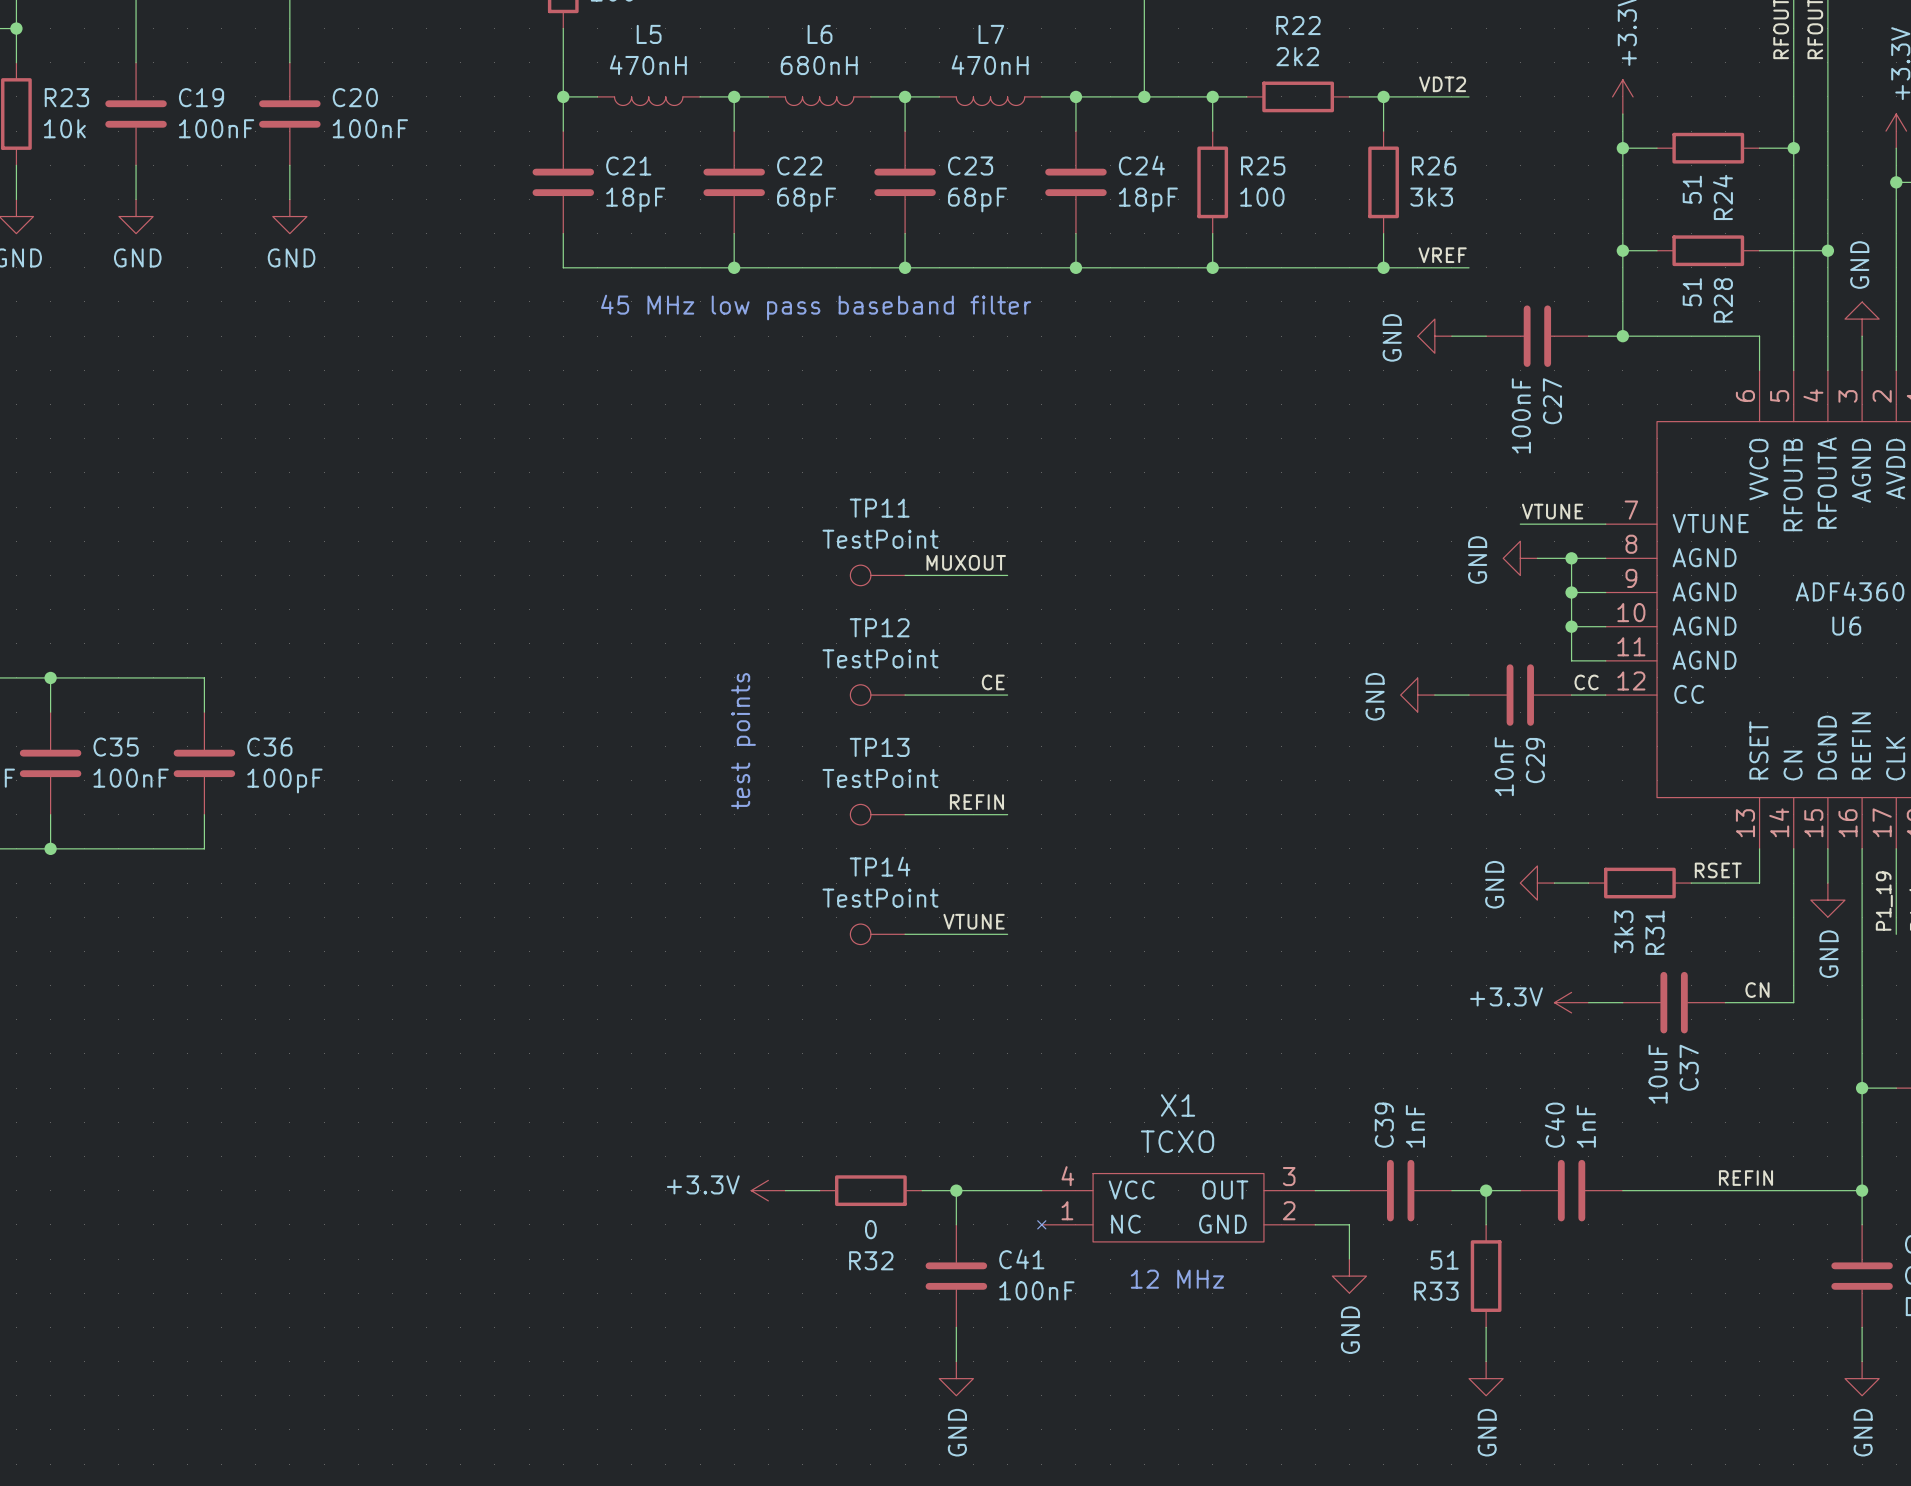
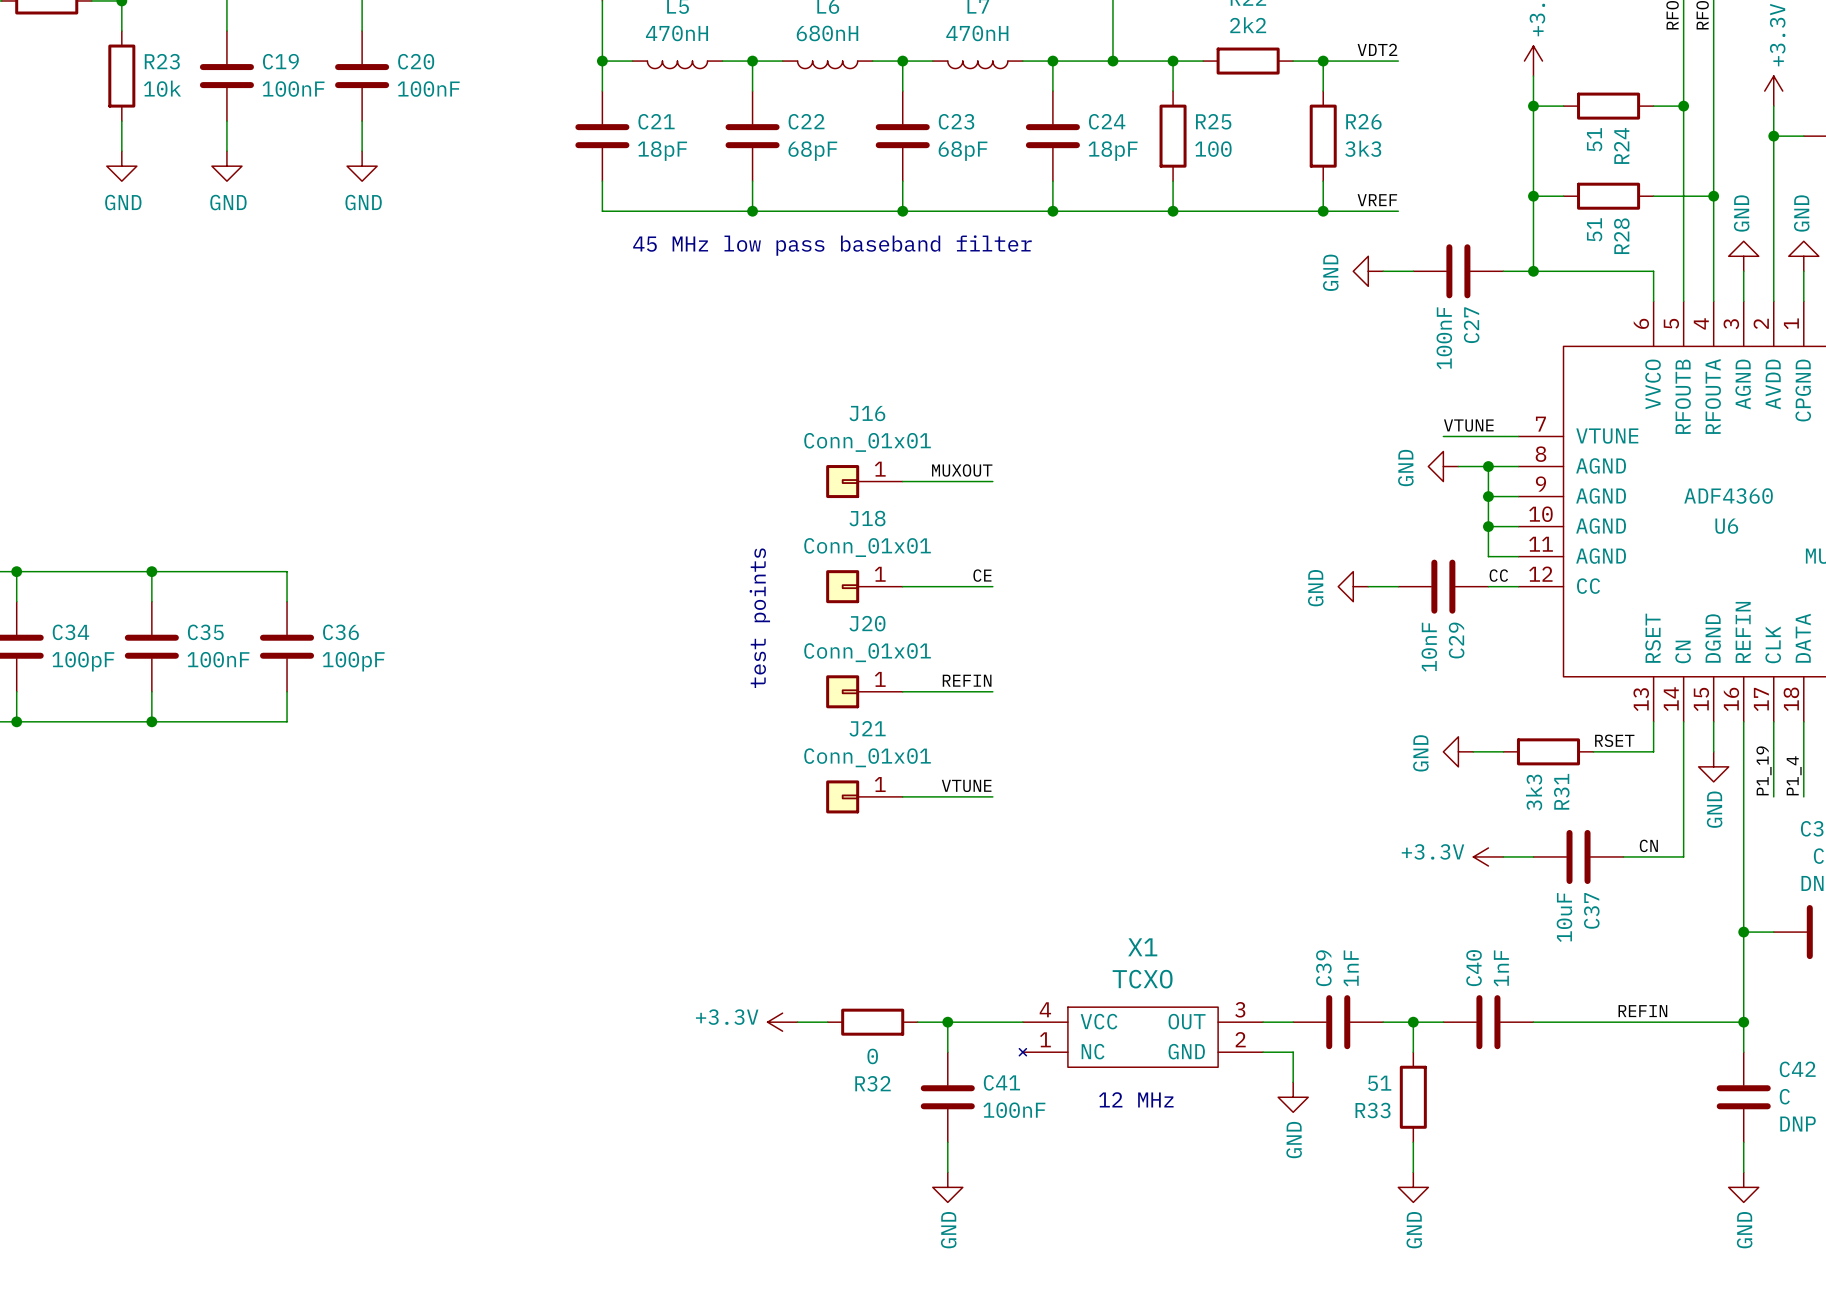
J16: none -> Conn_01x01 (864, 481)
TP11: TestPoint (877, 575) -> none
J18: none -> Conn_01x01 (864, 586)
TP12: TestPoint (877, 695) -> none
J20: none -> Conn_01x01 (864, 691)
TP13: TestPoint (877, 814) -> none
J21: none -> Conn_01x01 (864, 796)
TP14: TestPoint (877, 934) -> none

